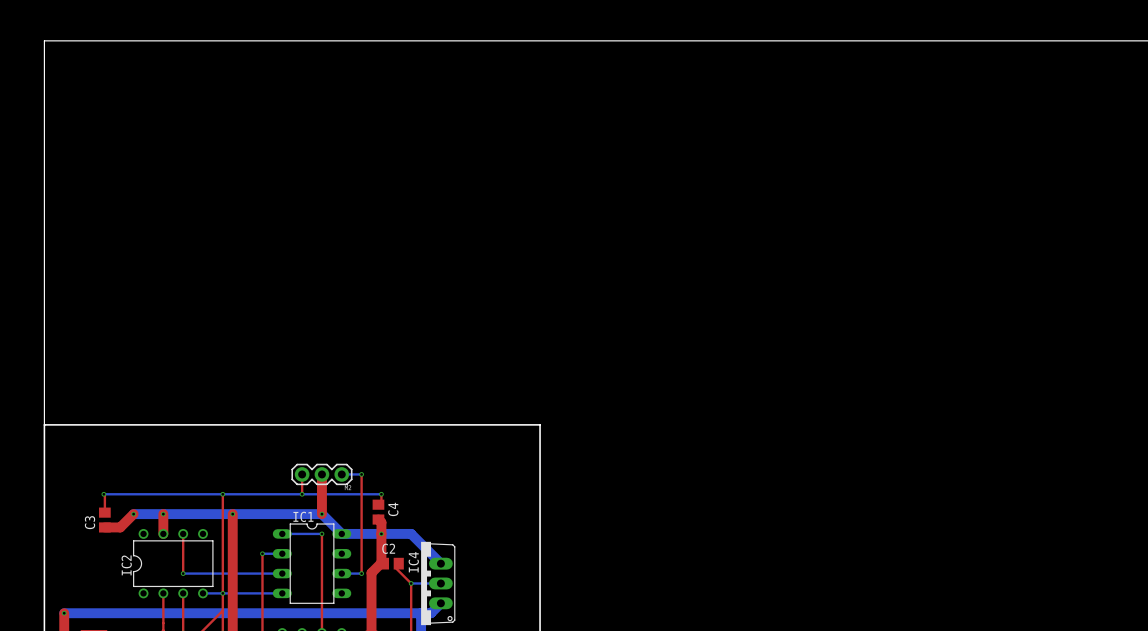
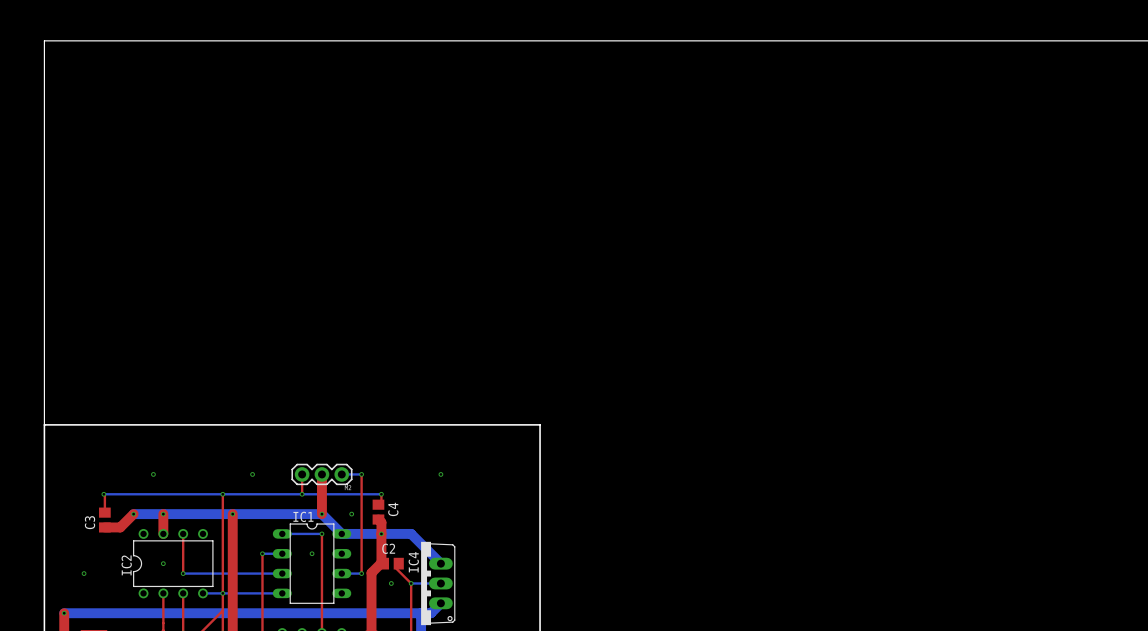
via: none -> (153, 474)
via: none -> (252, 474)
via: none -> (440, 474)
via: none -> (351, 514)
via: none -> (312, 553)
via: none -> (163, 563)
via: none -> (84, 573)
via: none -> (391, 583)

